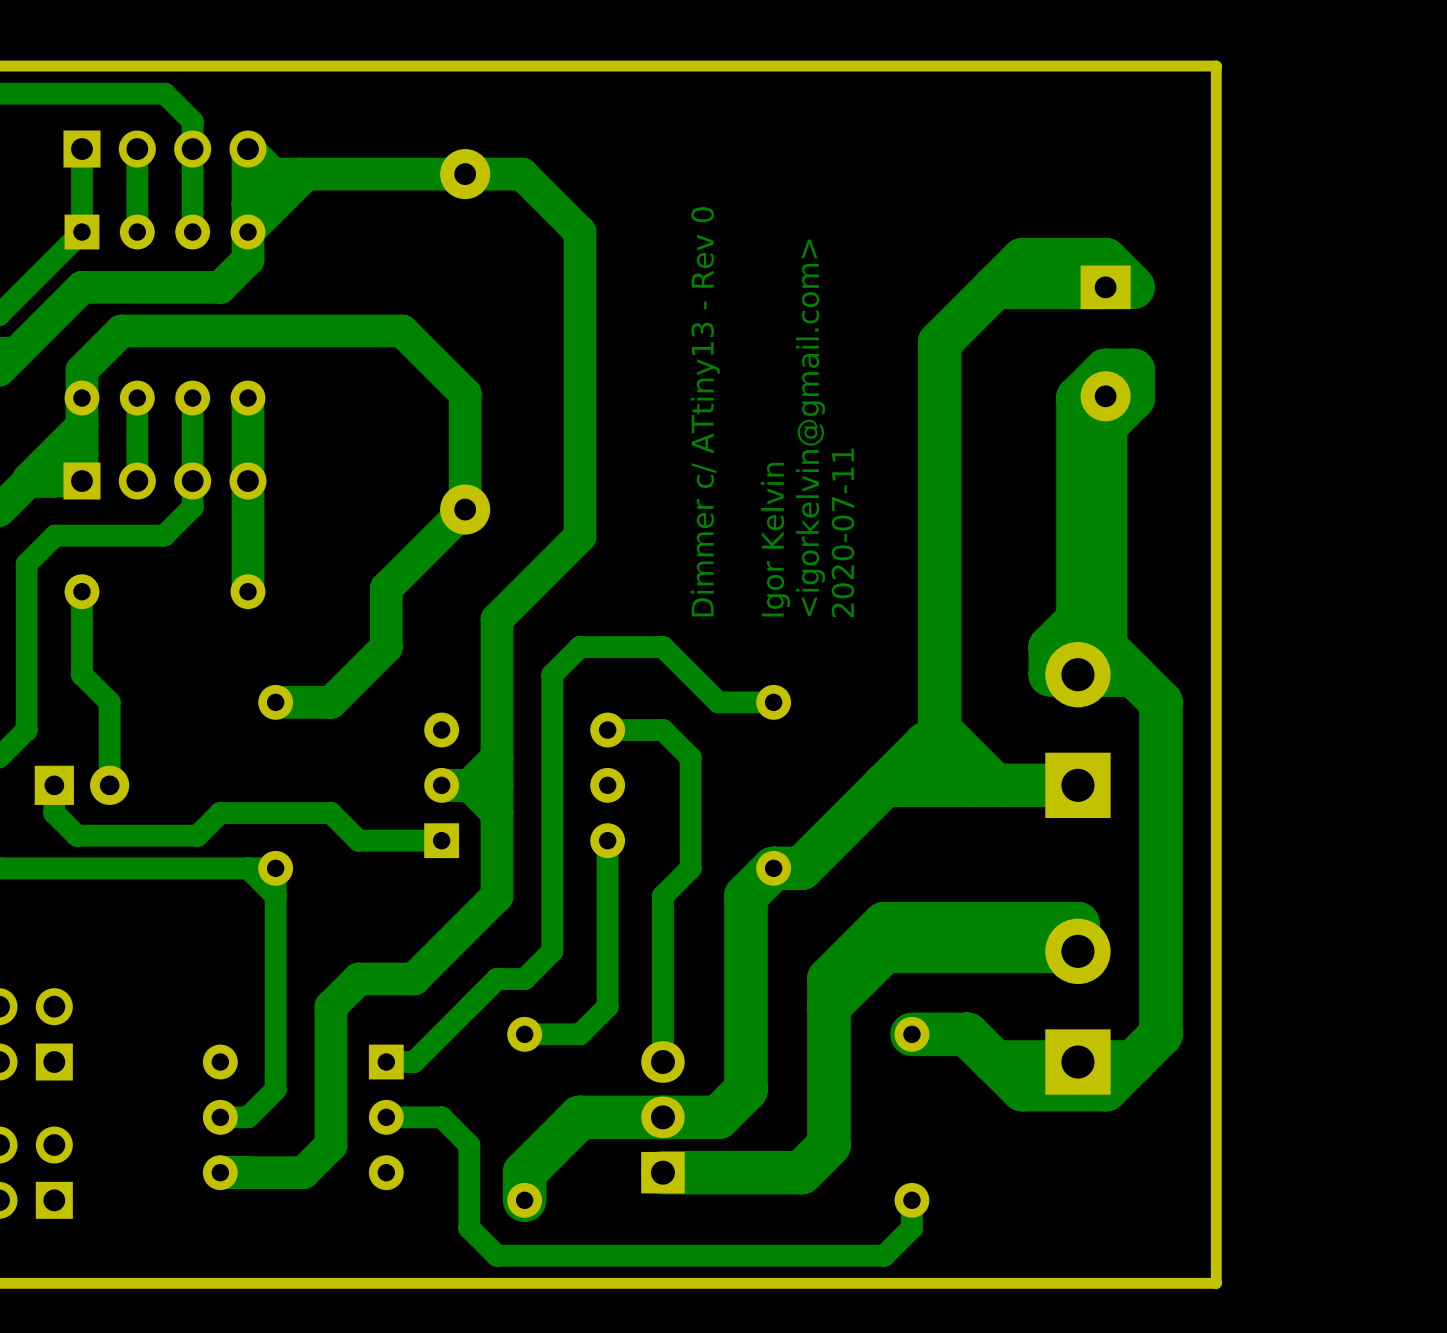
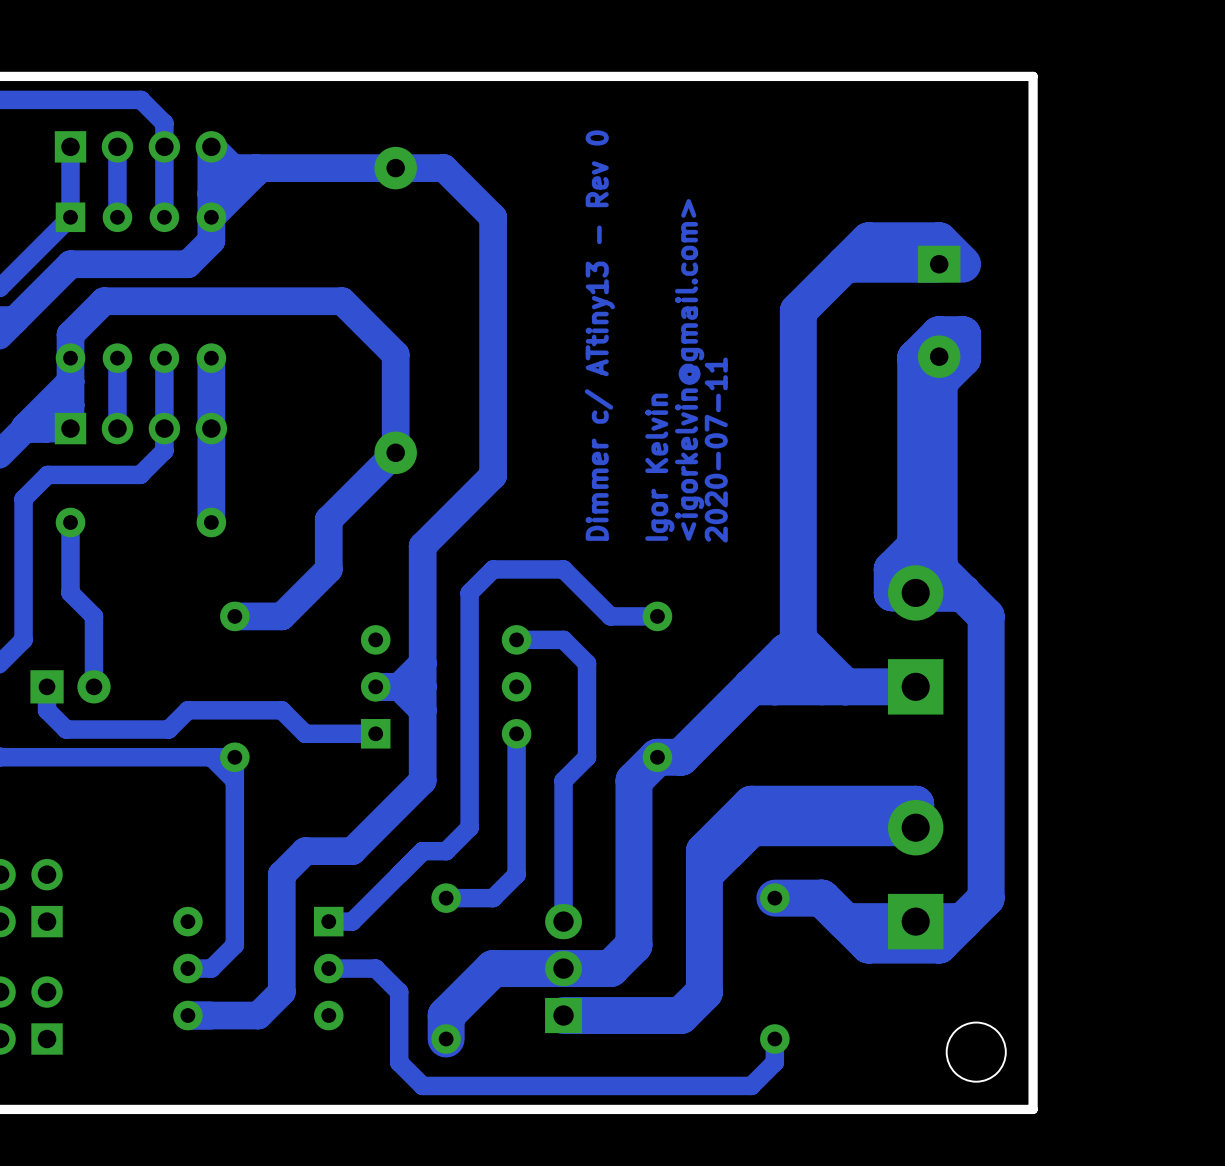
round board edge: none -> [946, 1022, 1007, 1083]

